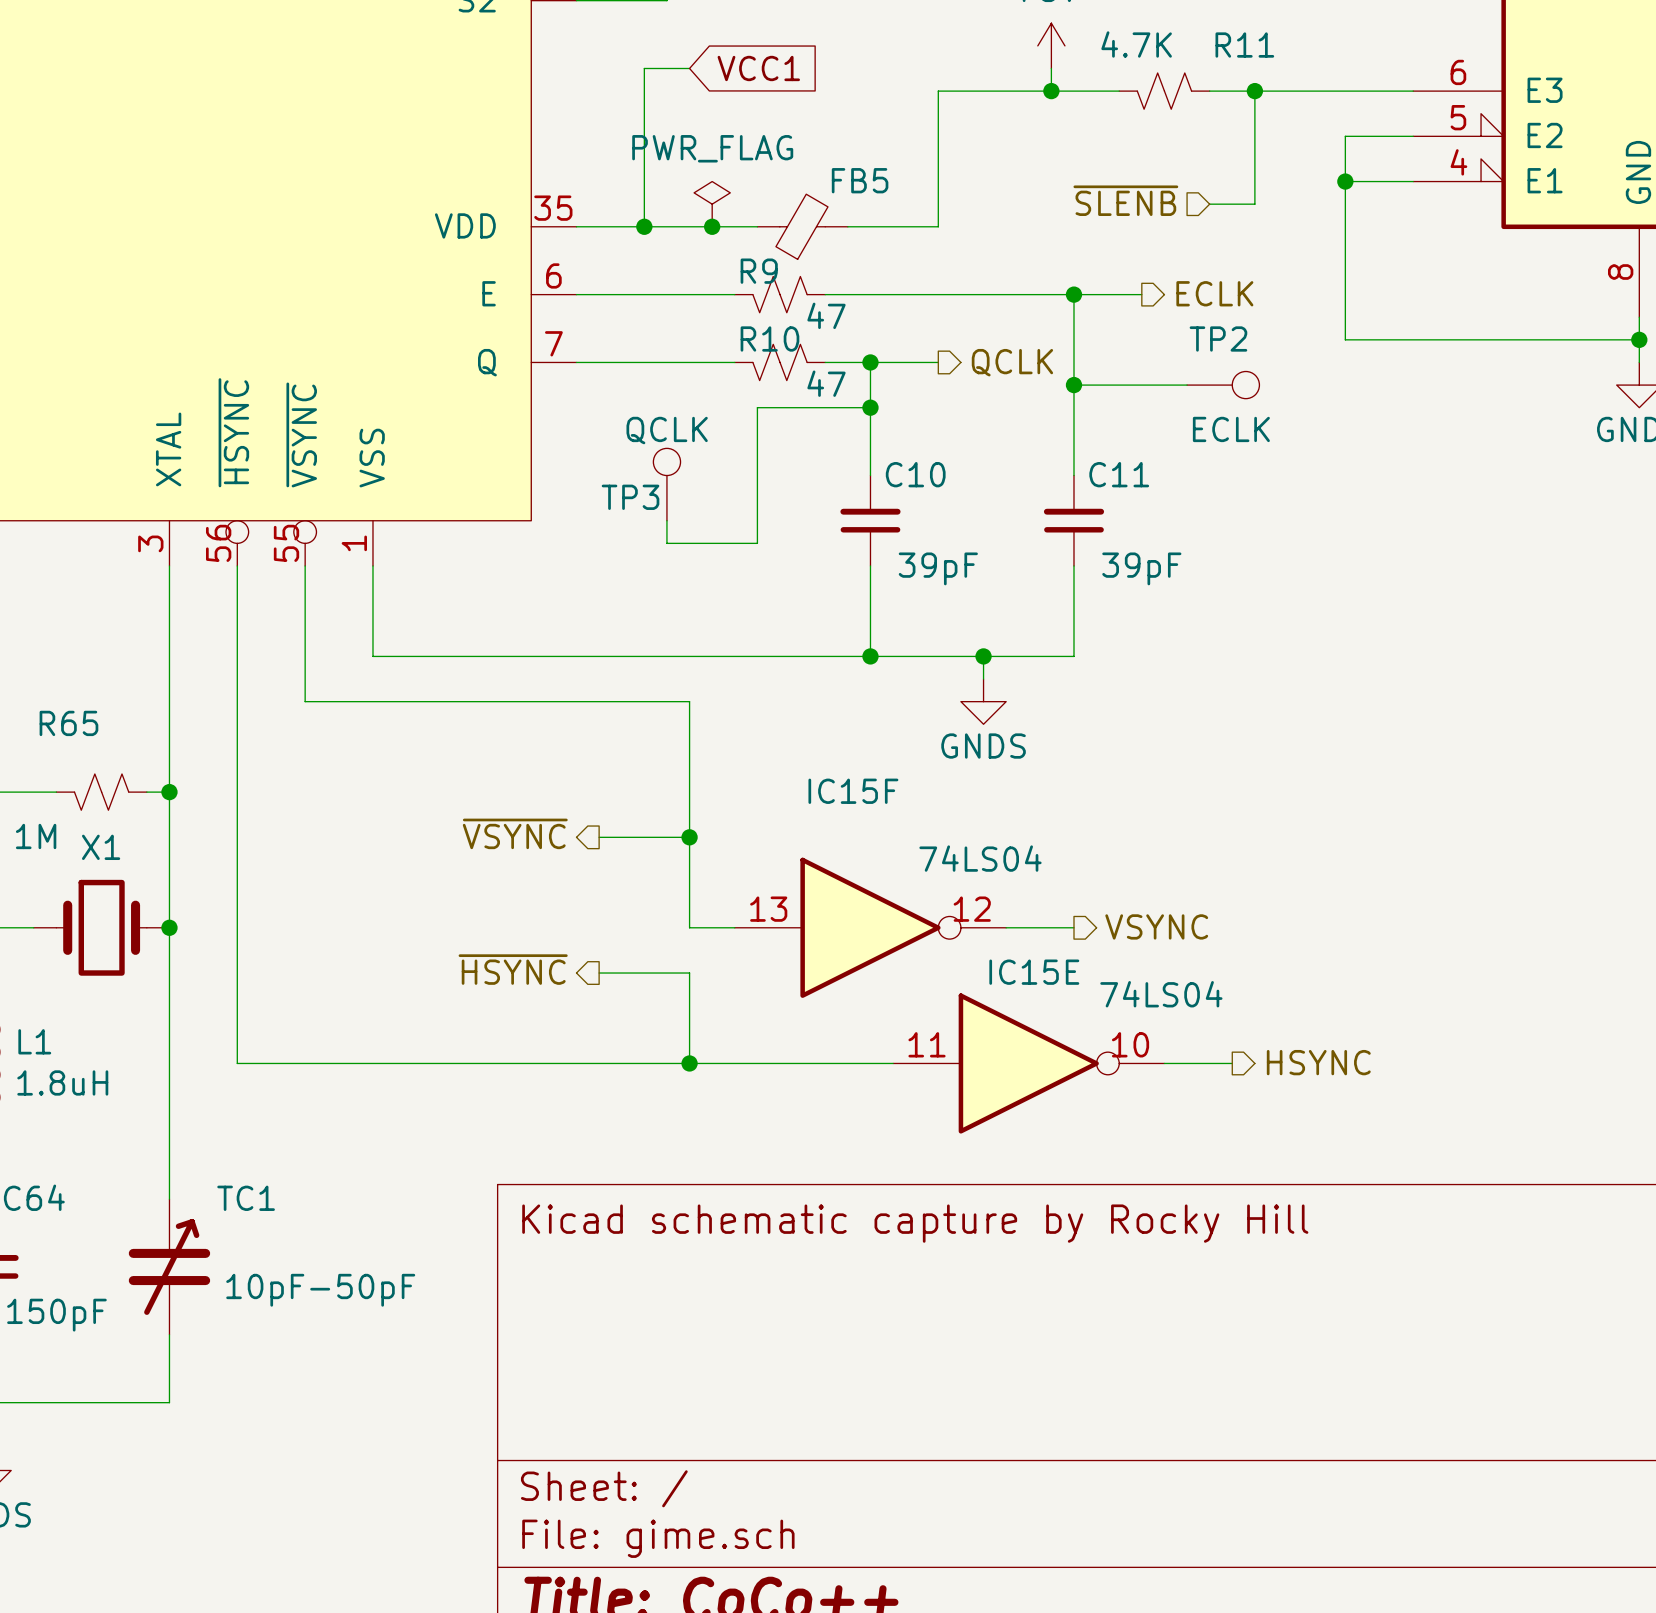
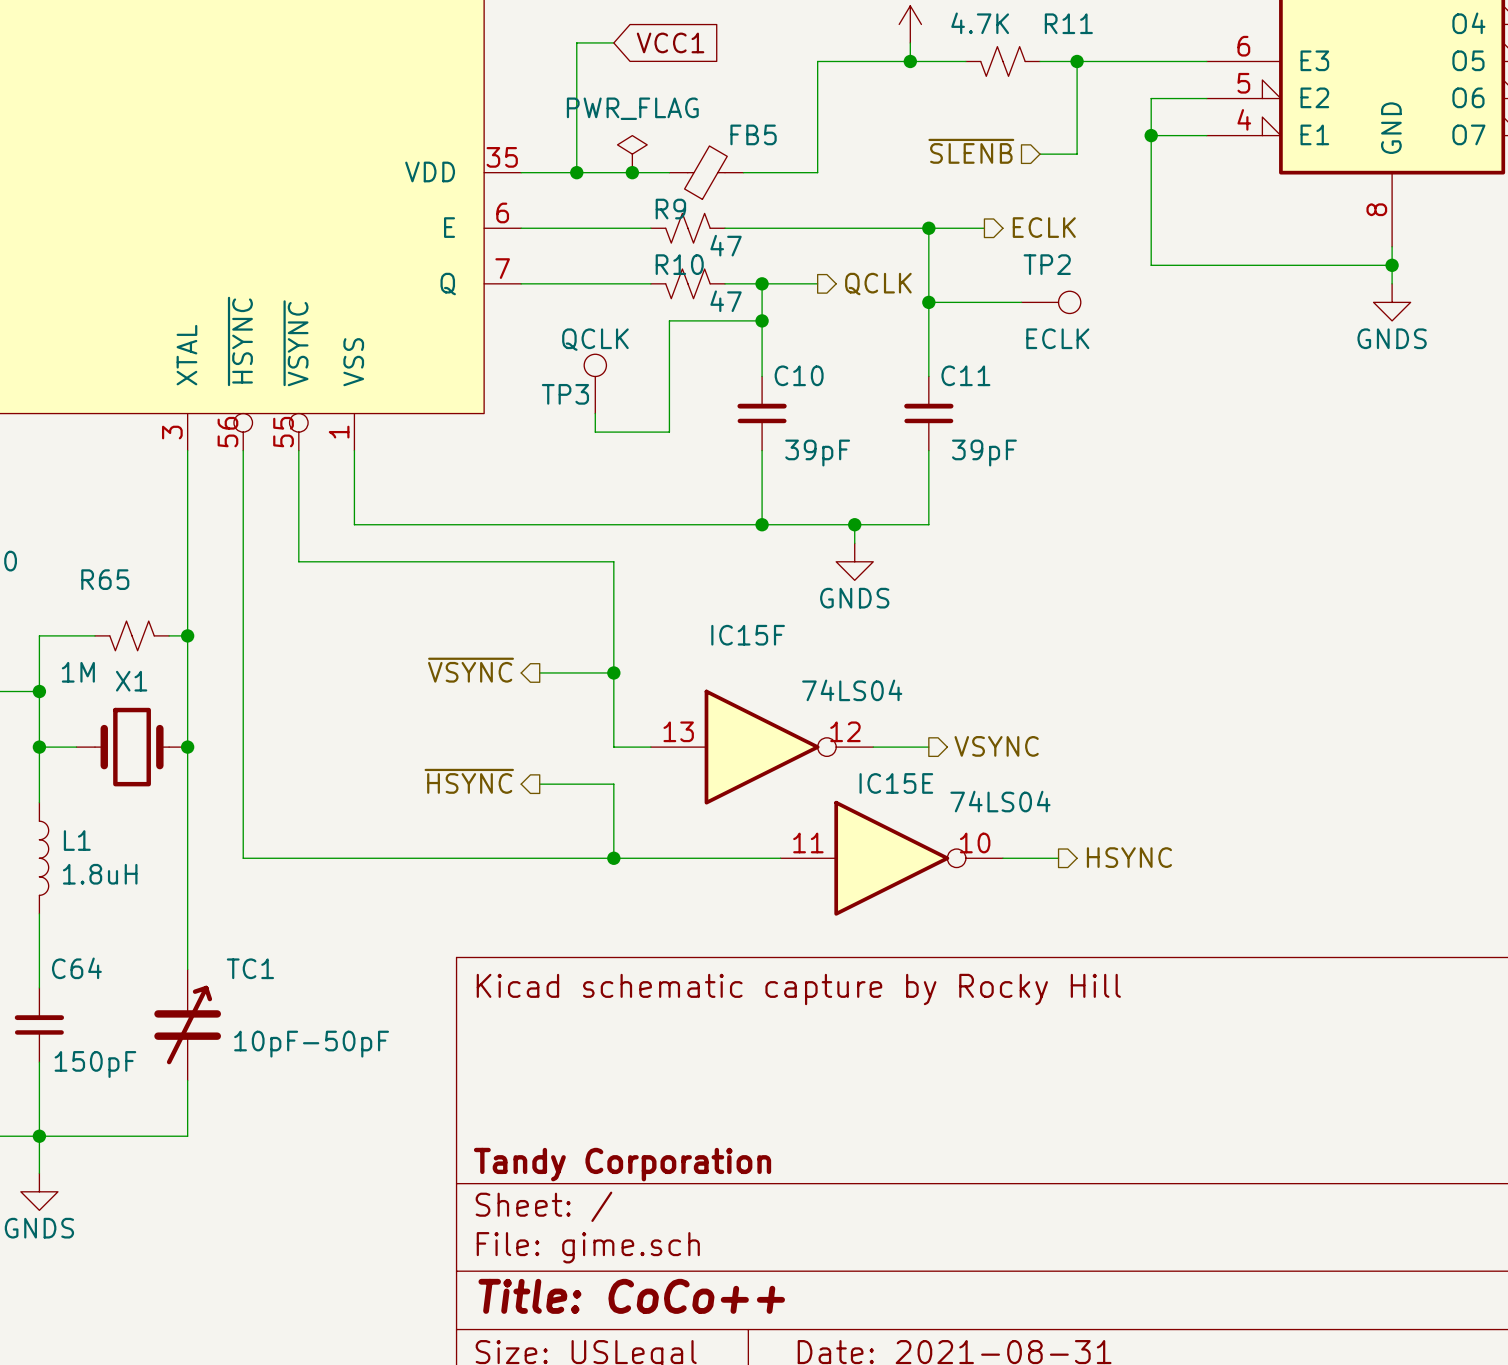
title block: none -> Tandy Corporation (622, 1164)

